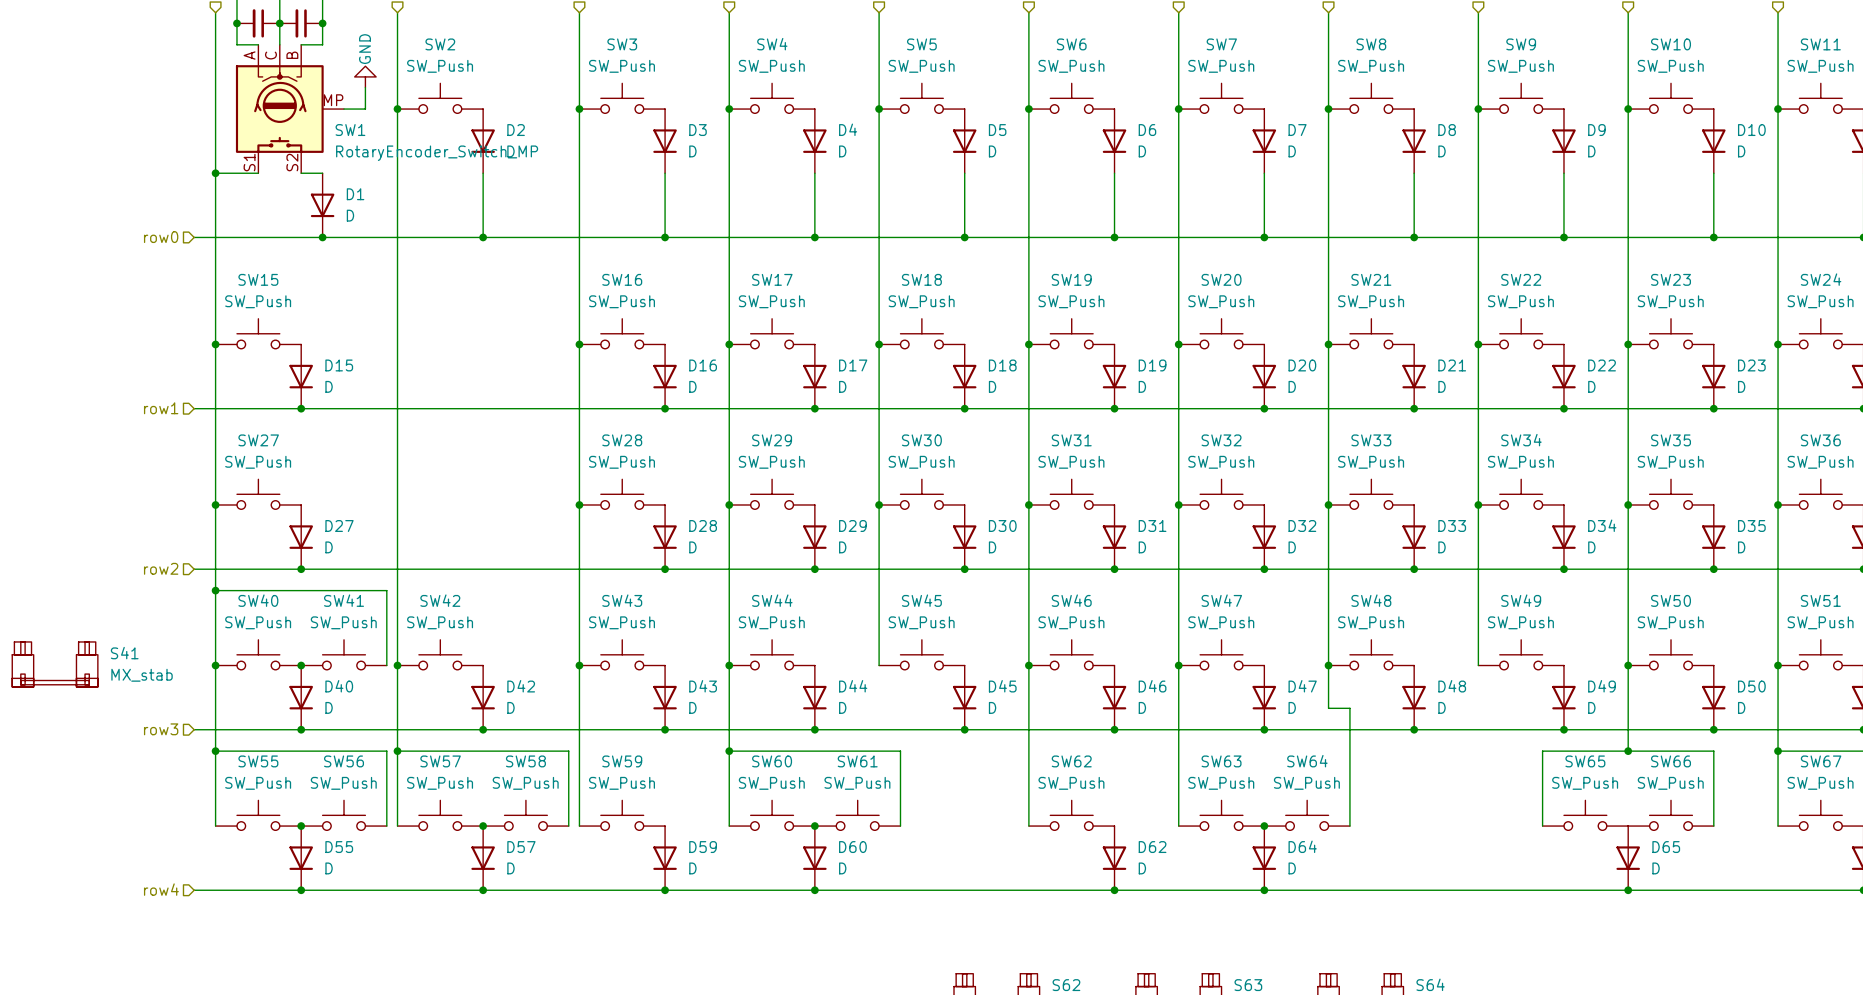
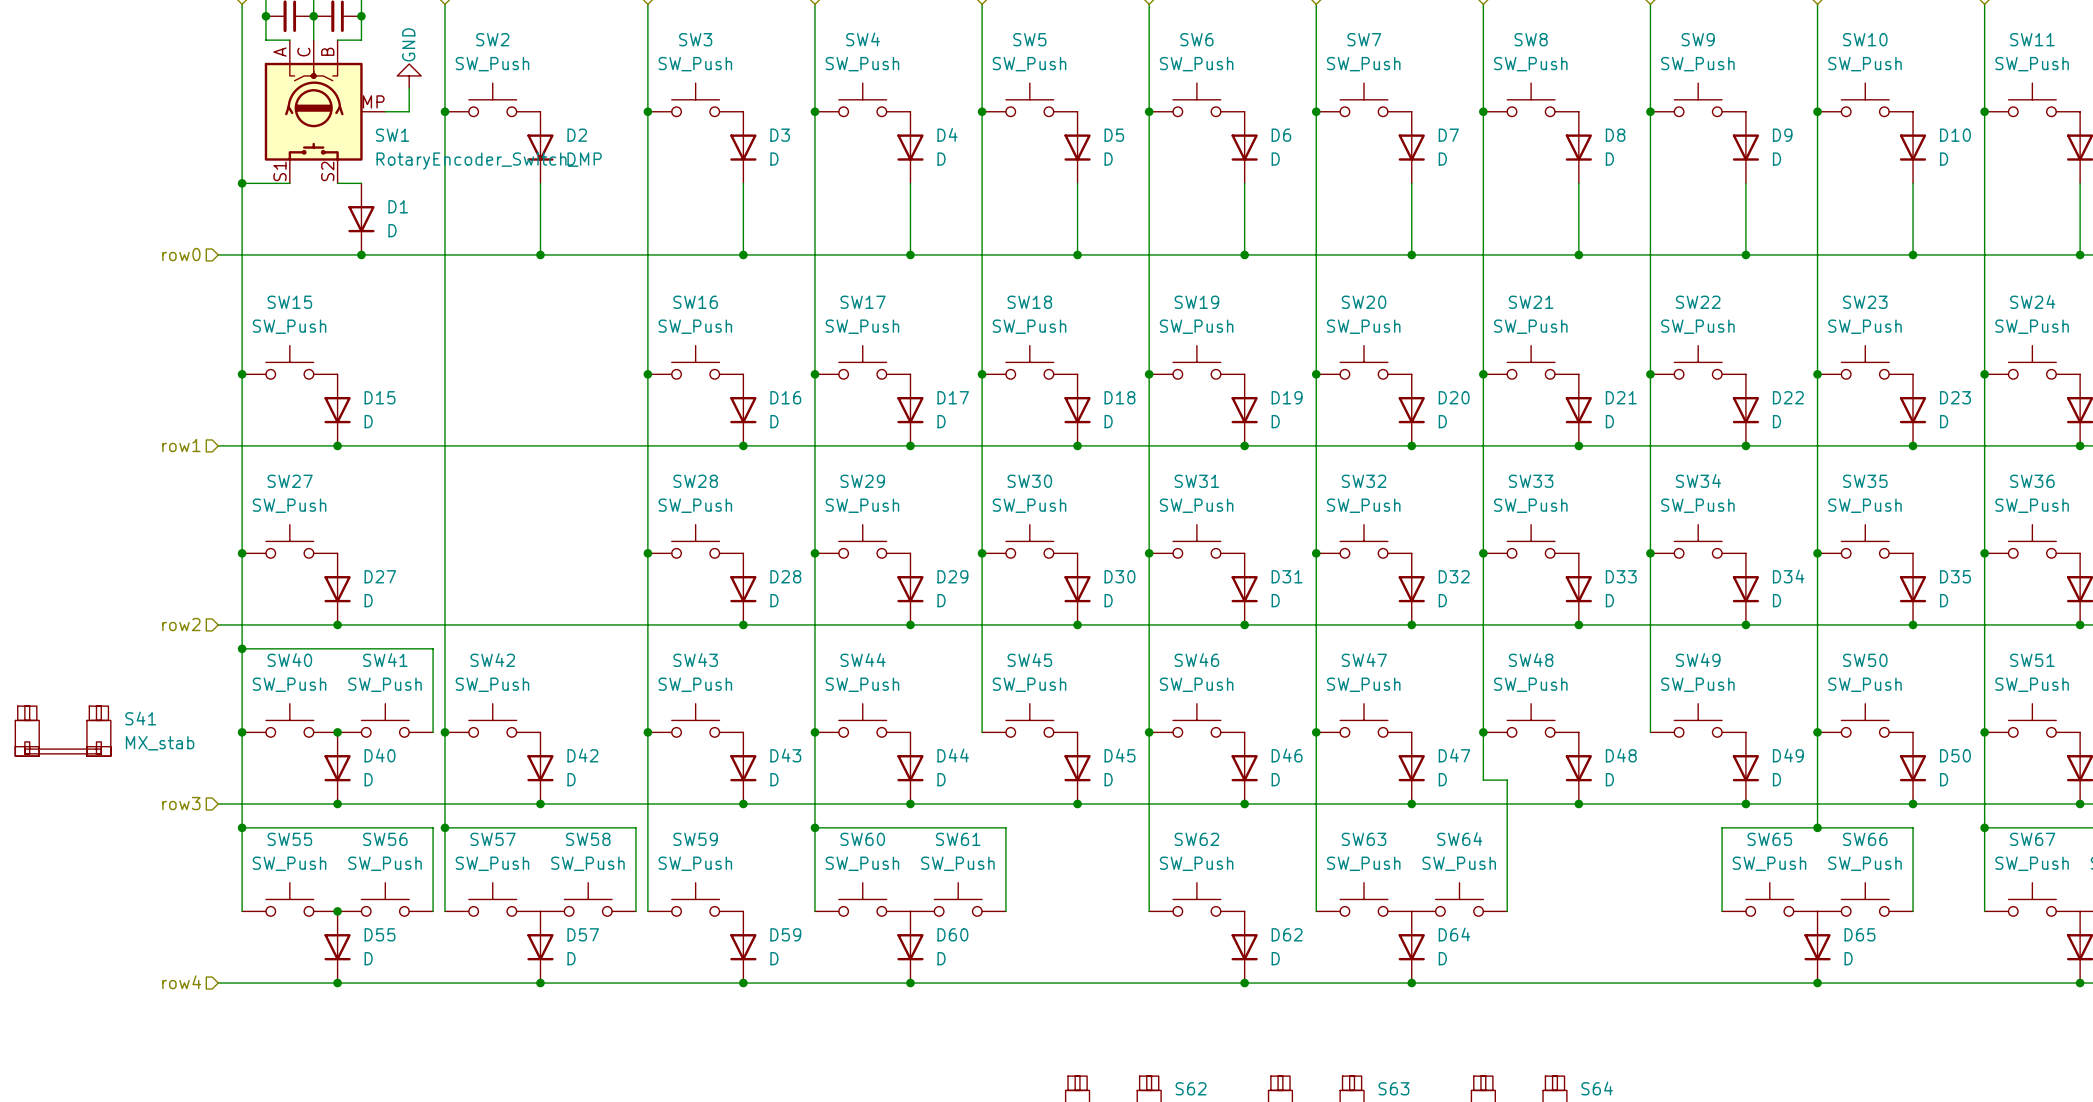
junction: (483, 826) -> none
junction: (814, 826) -> none
junction: (1264, 826) -> none

